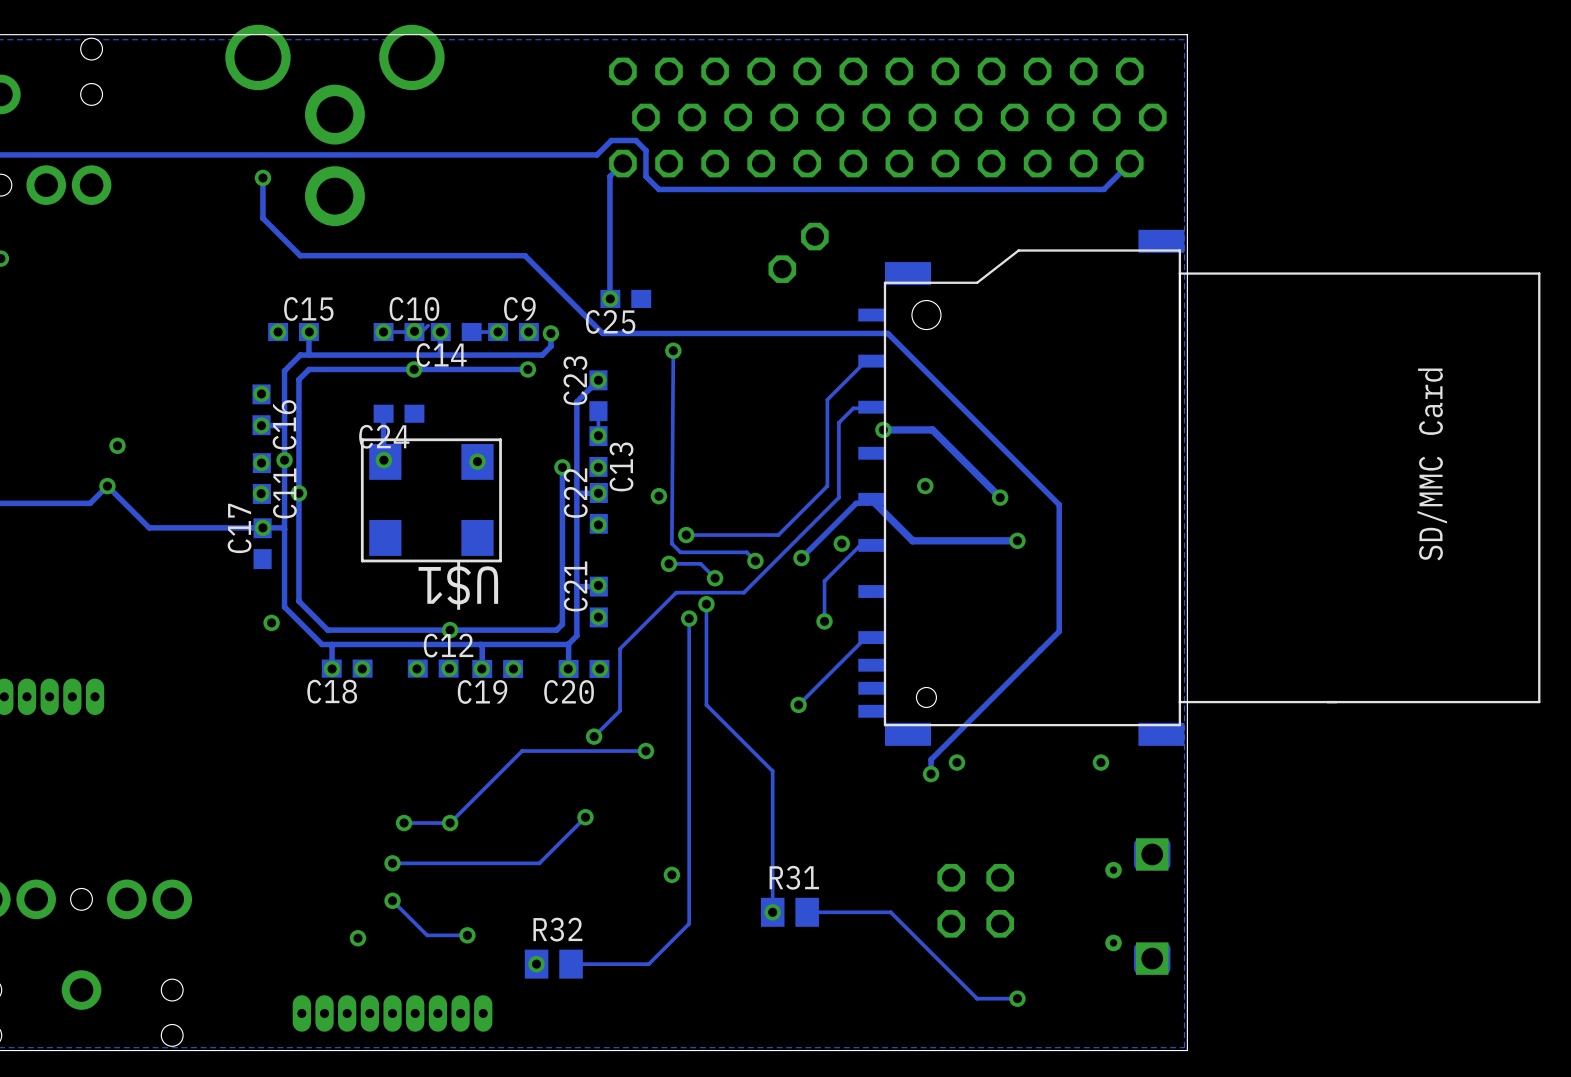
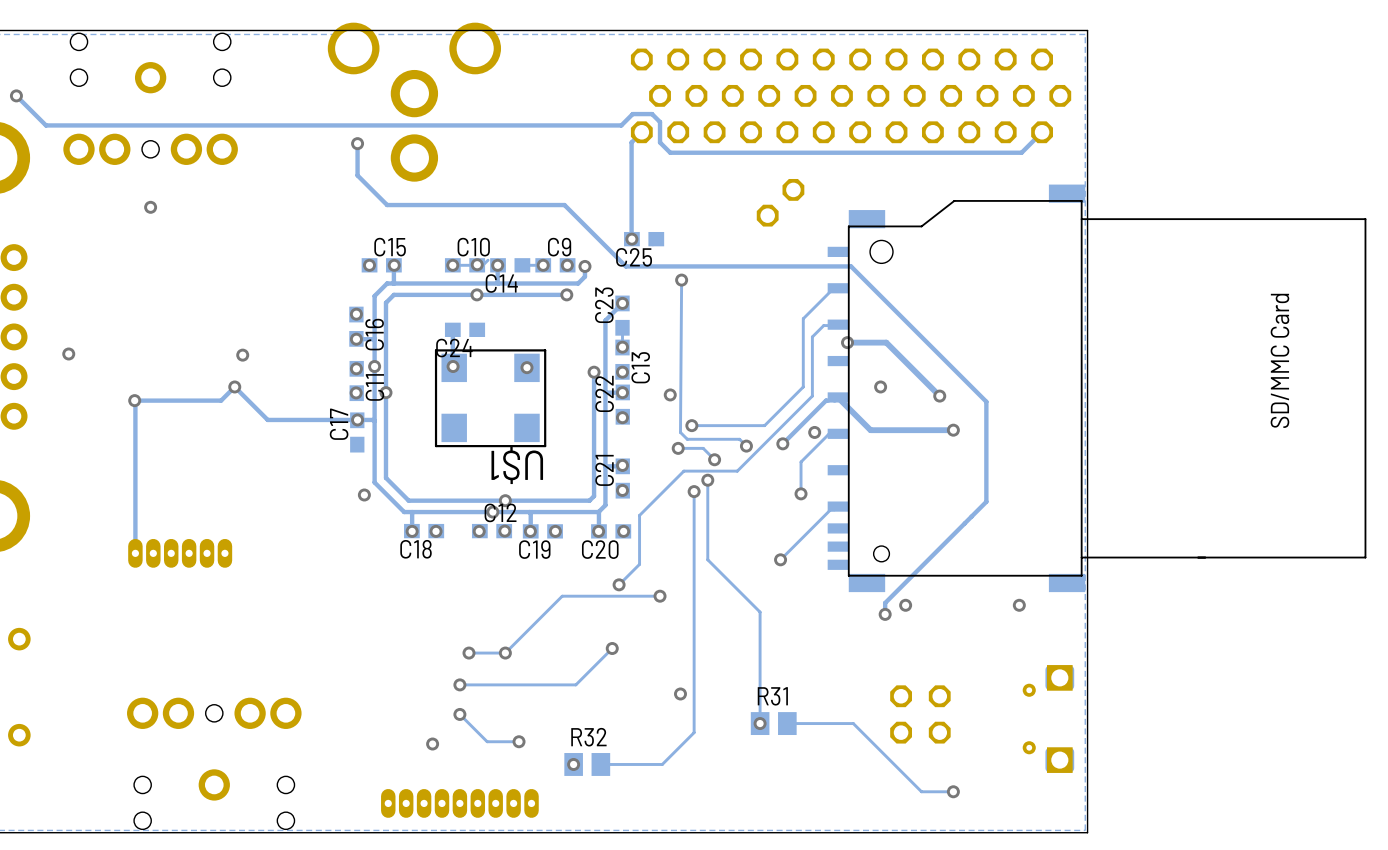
via: none -> (492, 512)

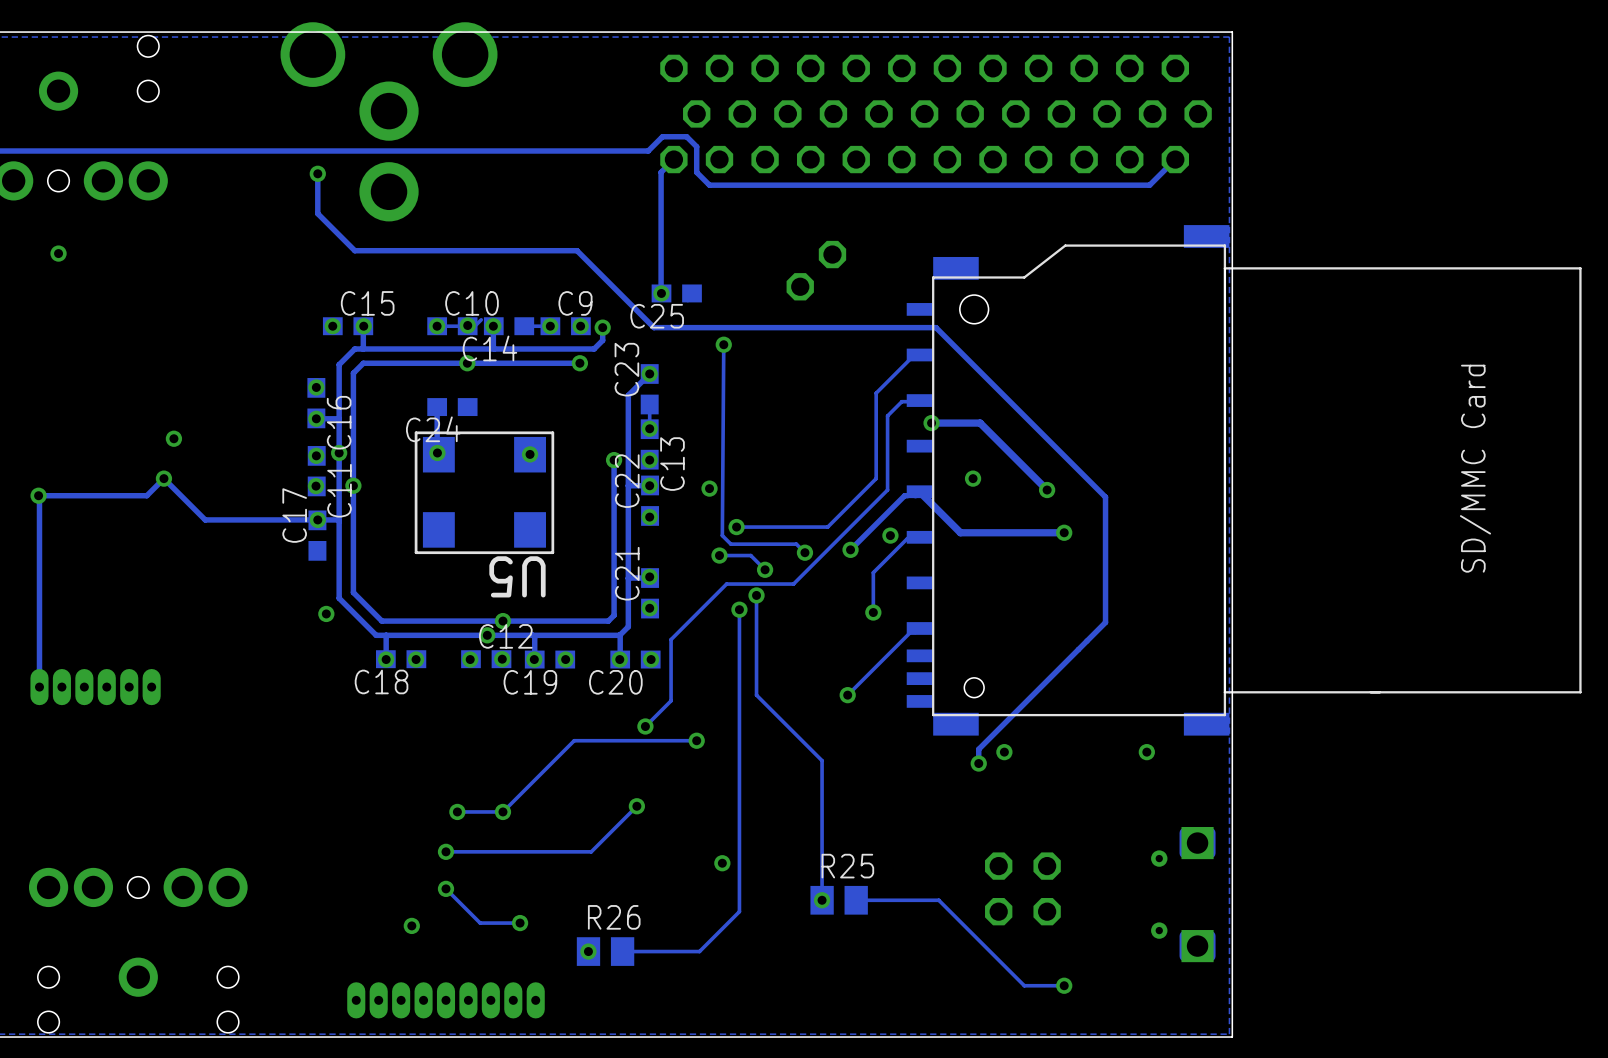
part position: (780, 202) -> (816, 270)
U$1 name: U$1 (517, 465) -> U5 (517, 576)
R31 name: R31 (772, 696) -> R25 (847, 866)
R32 name: R32 (588, 737) -> R26 (614, 917)

